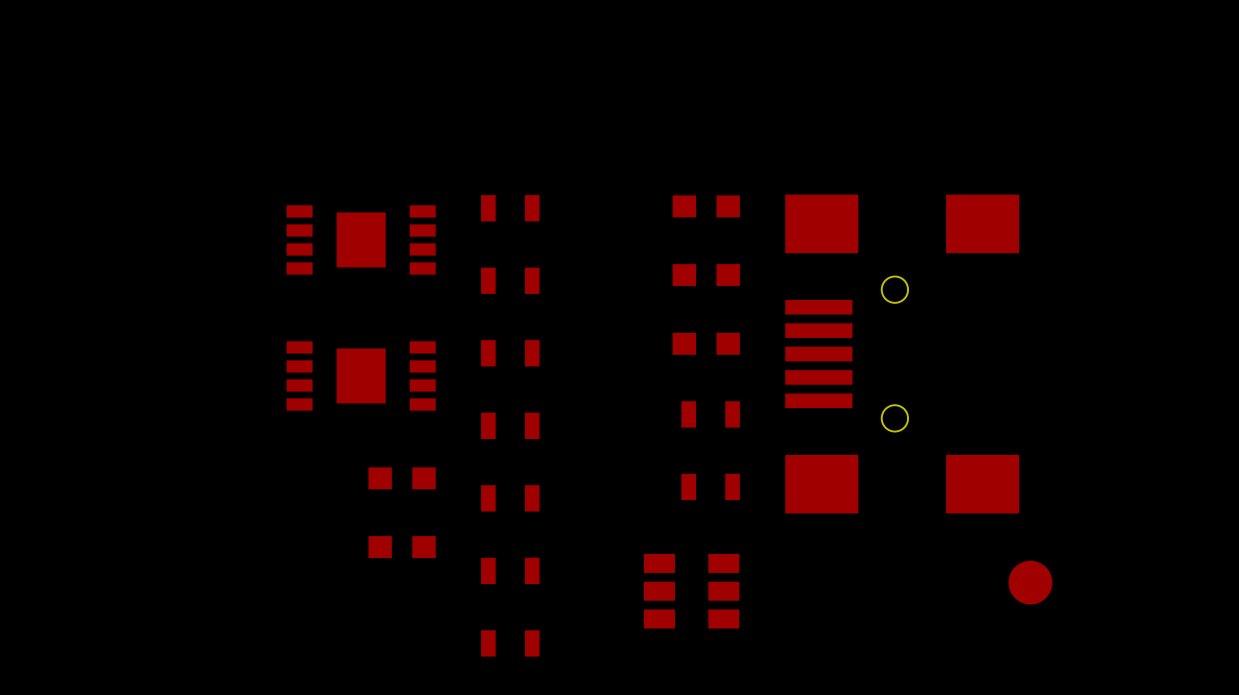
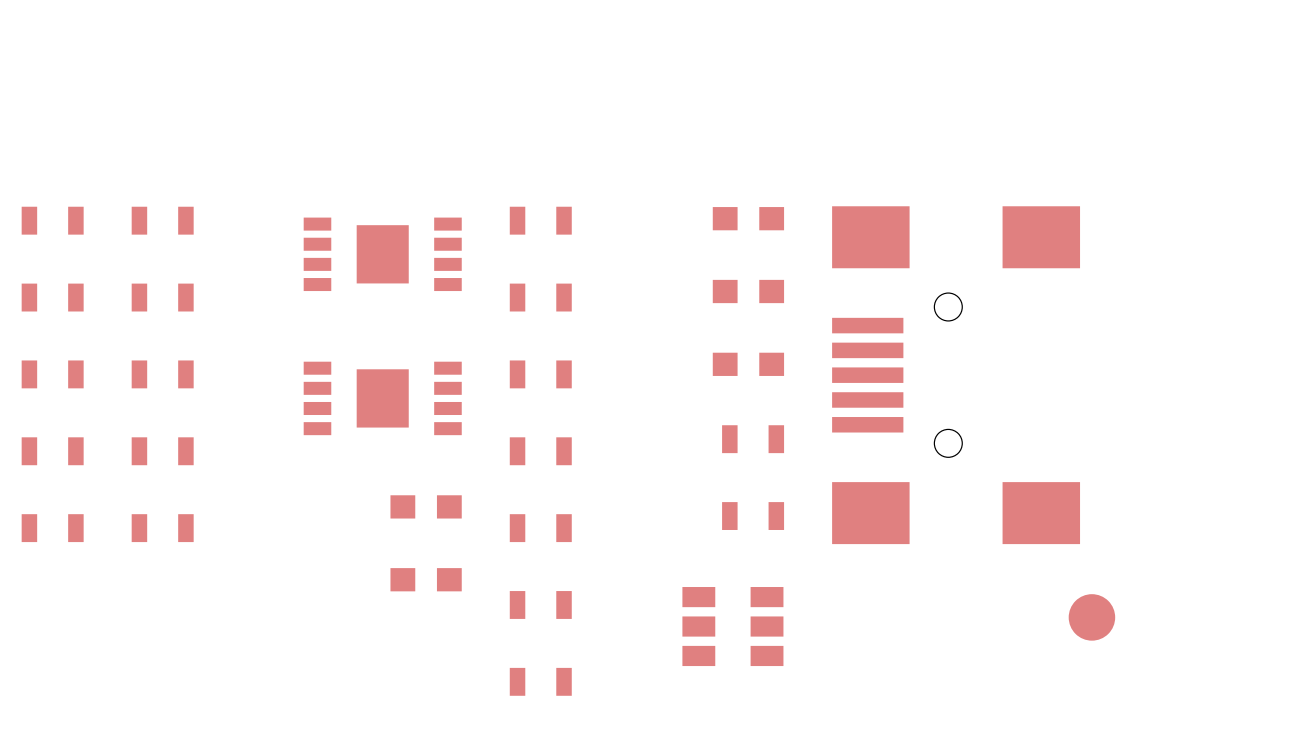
part: none -> (52, 220)
part: none -> (162, 220)
part: none -> (52, 297)
part: none -> (162, 297)
part: none -> (52, 374)
part: none -> (162, 374)
part: none -> (52, 451)
part: none -> (162, 451)
part: none -> (52, 528)
part: none -> (162, 528)

